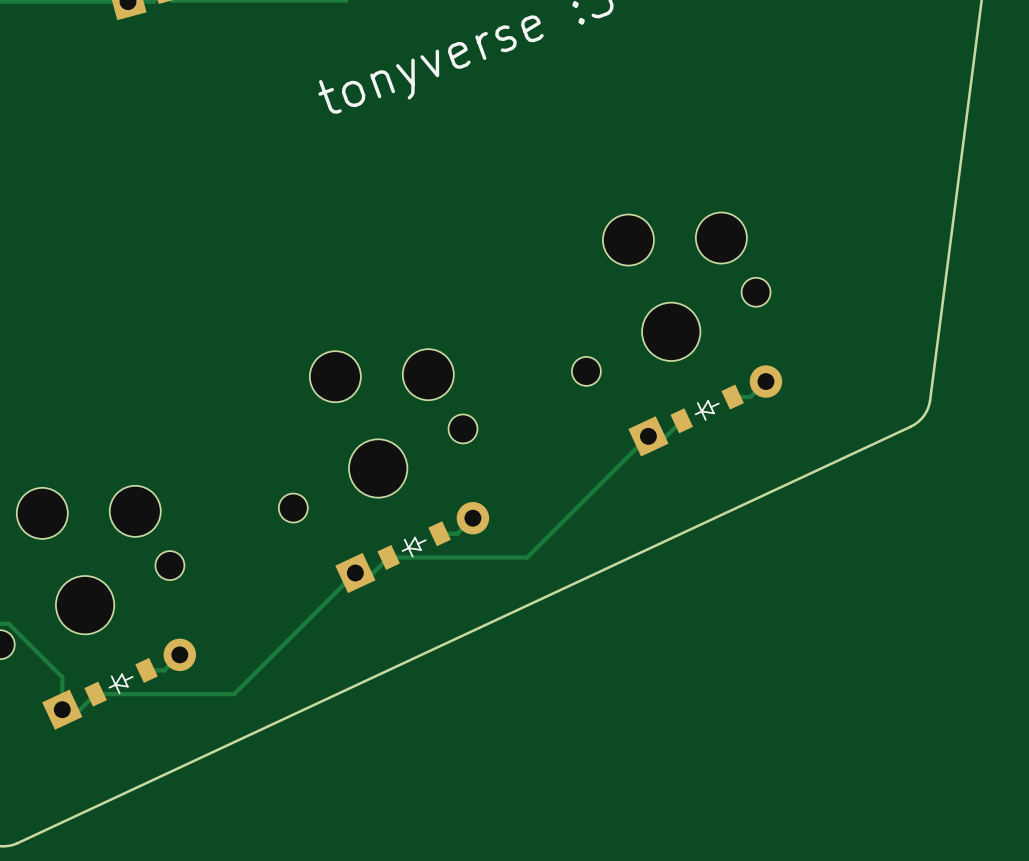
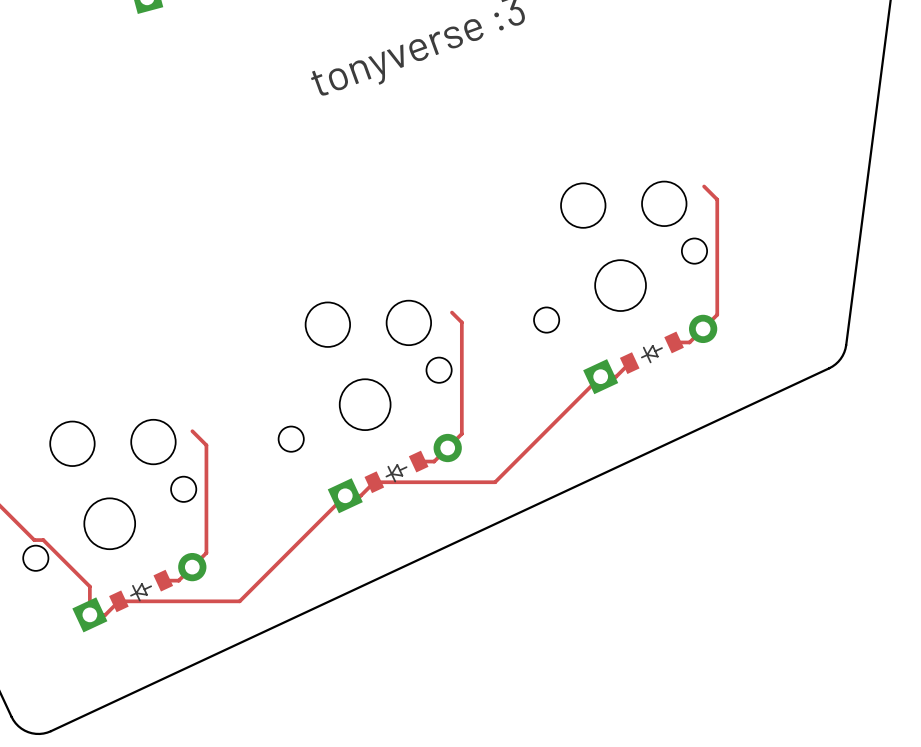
track: none -> (704, 186) (717, 199) (717, 314) (703, 328)
track: none -> (451, 312) (461, 322) (461, 433) (447, 448)
track: none -> (192, 431) (206, 445) (206, 552) (192, 567)

